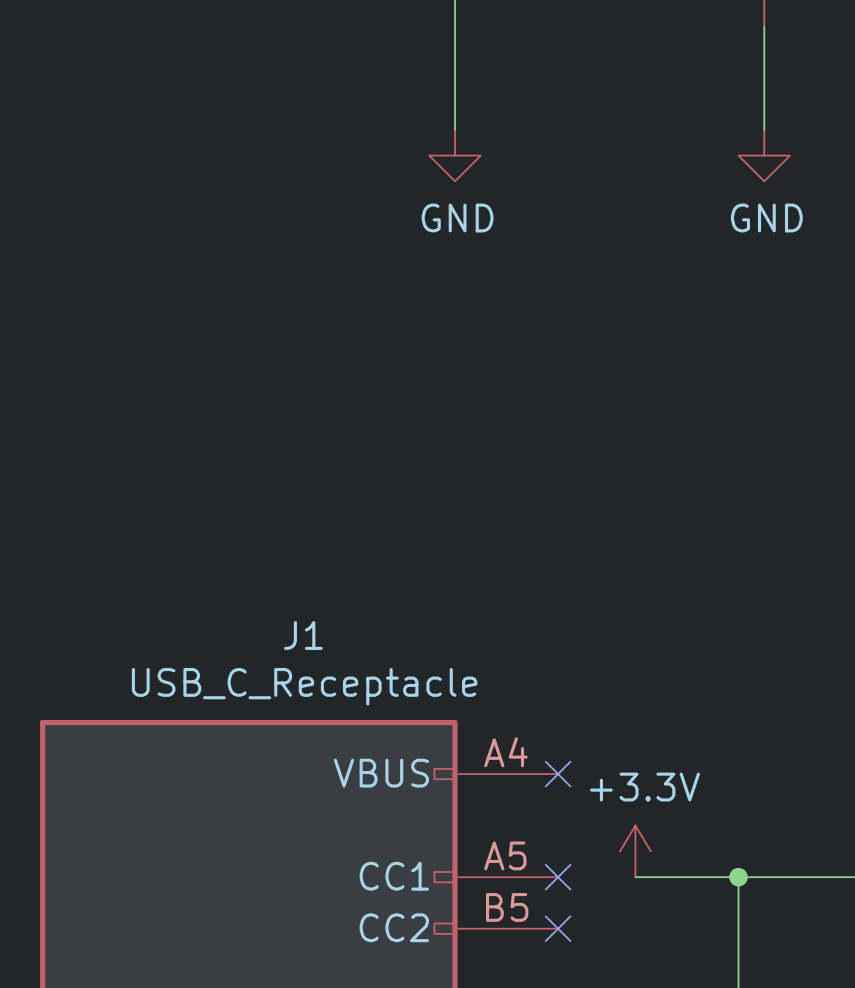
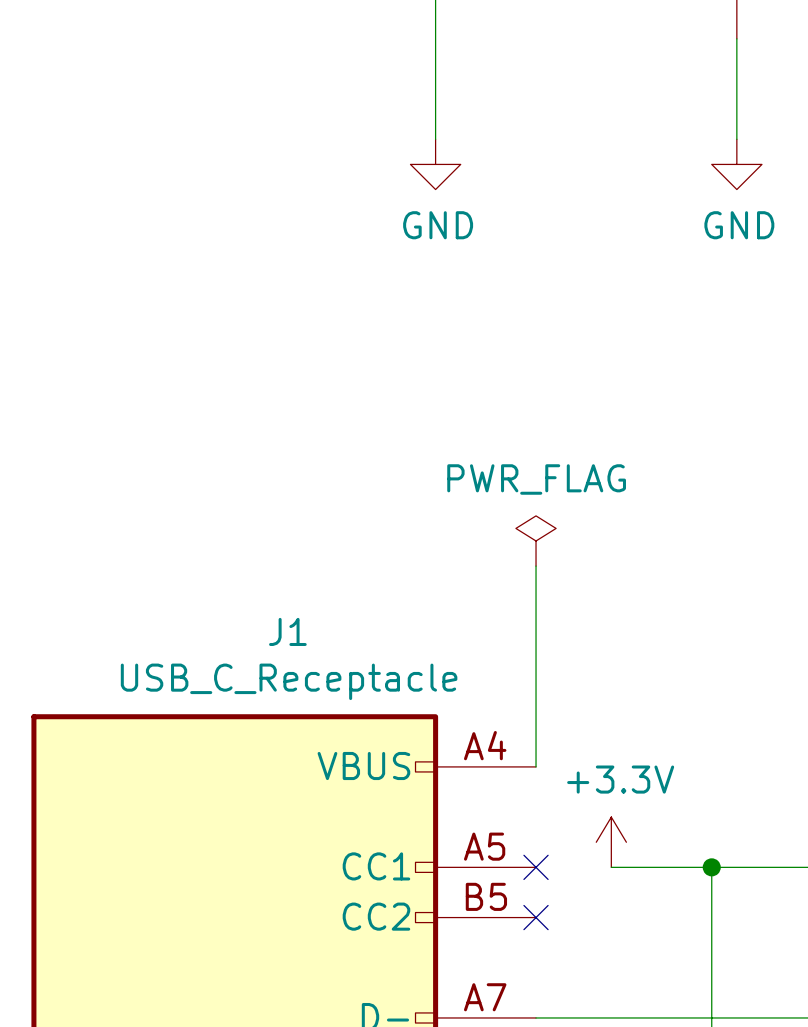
power symbol: none -> PWR_FLAG (536, 540)
wire: none -> (536, 566) (536, 766)
no-connect mark: (558, 774) -> none

